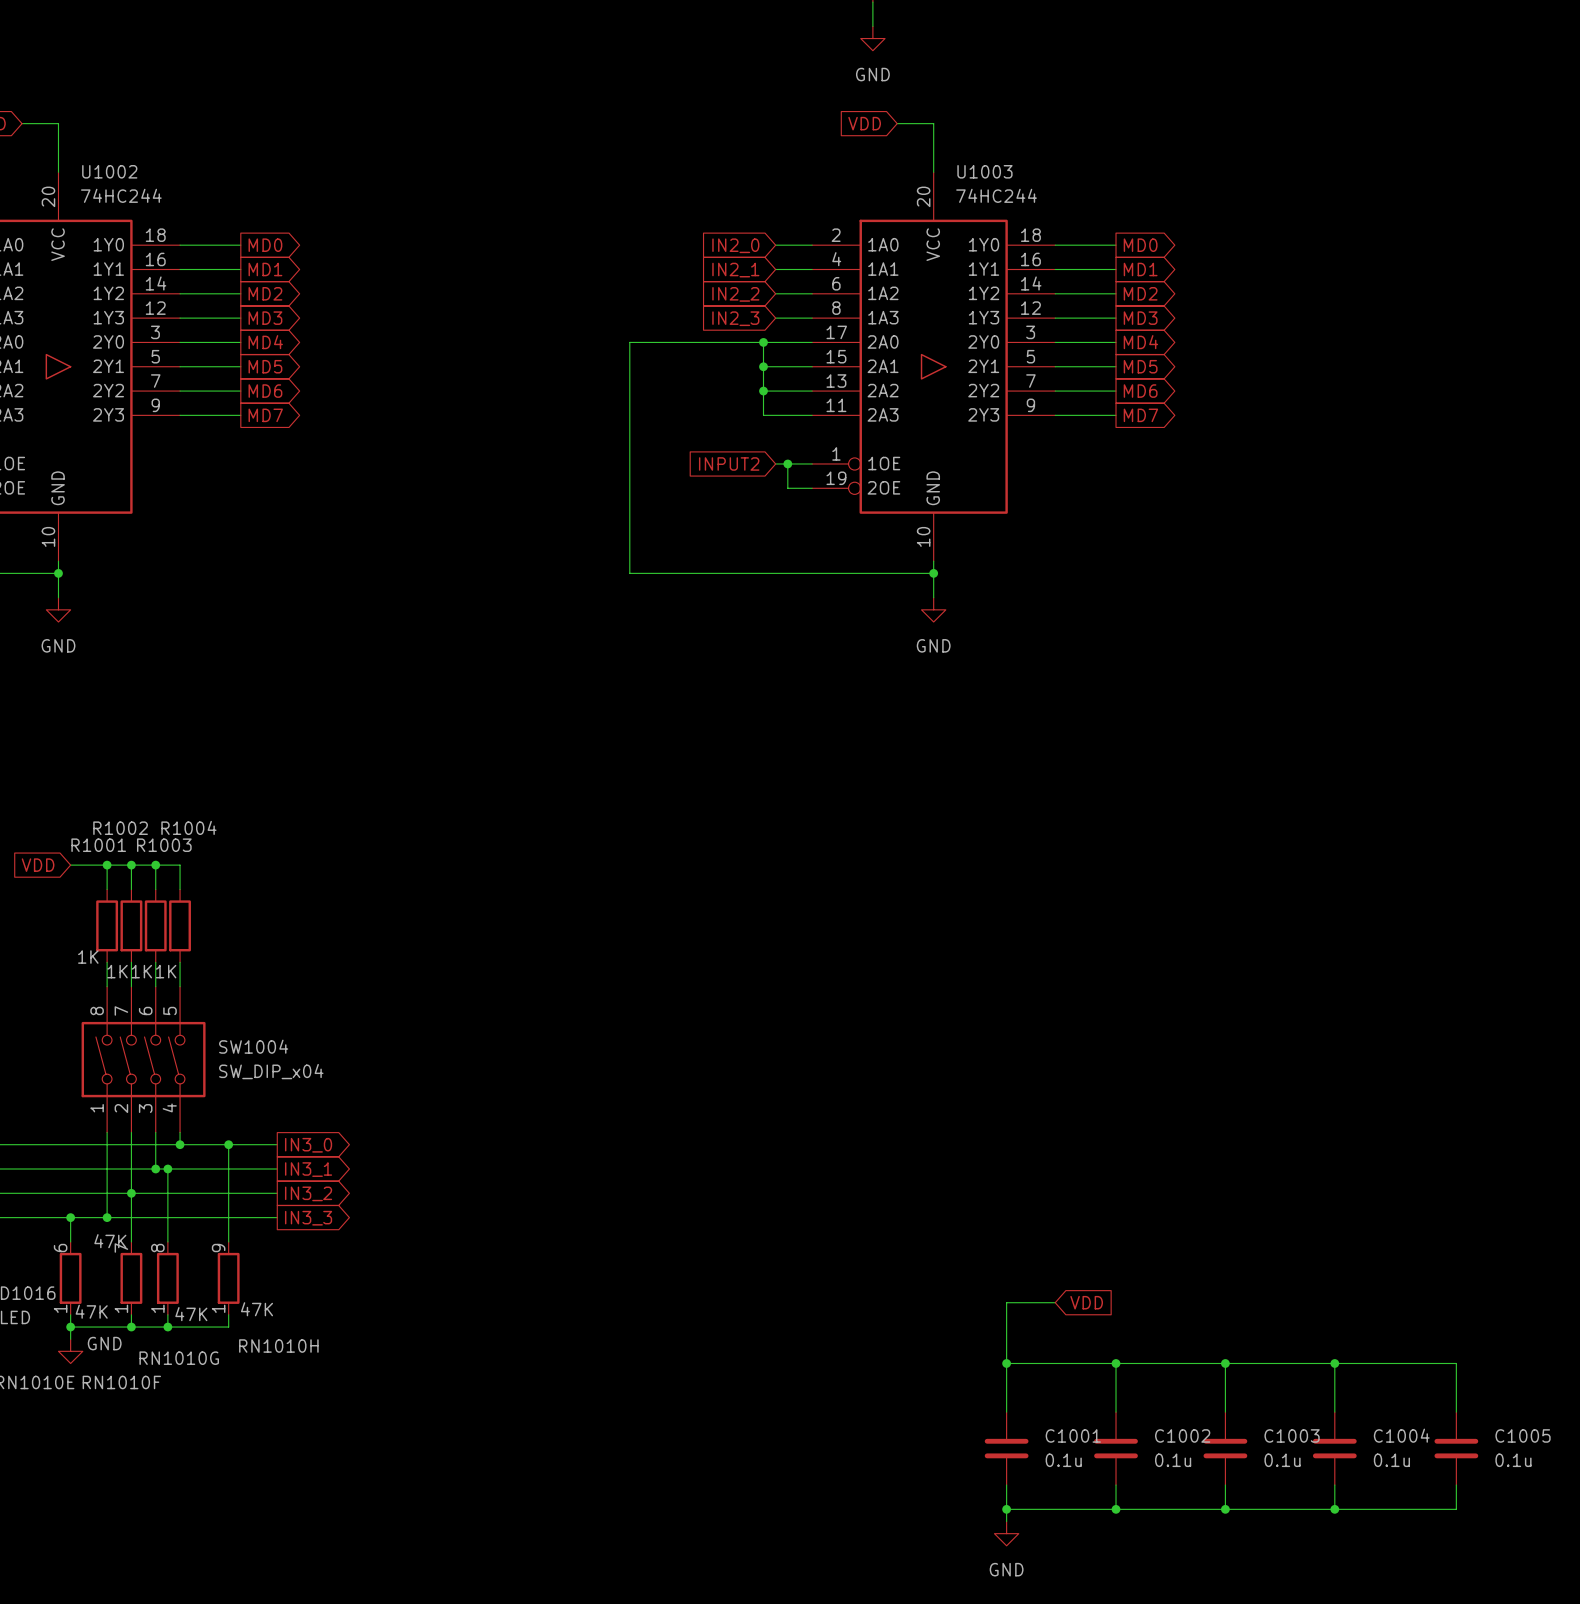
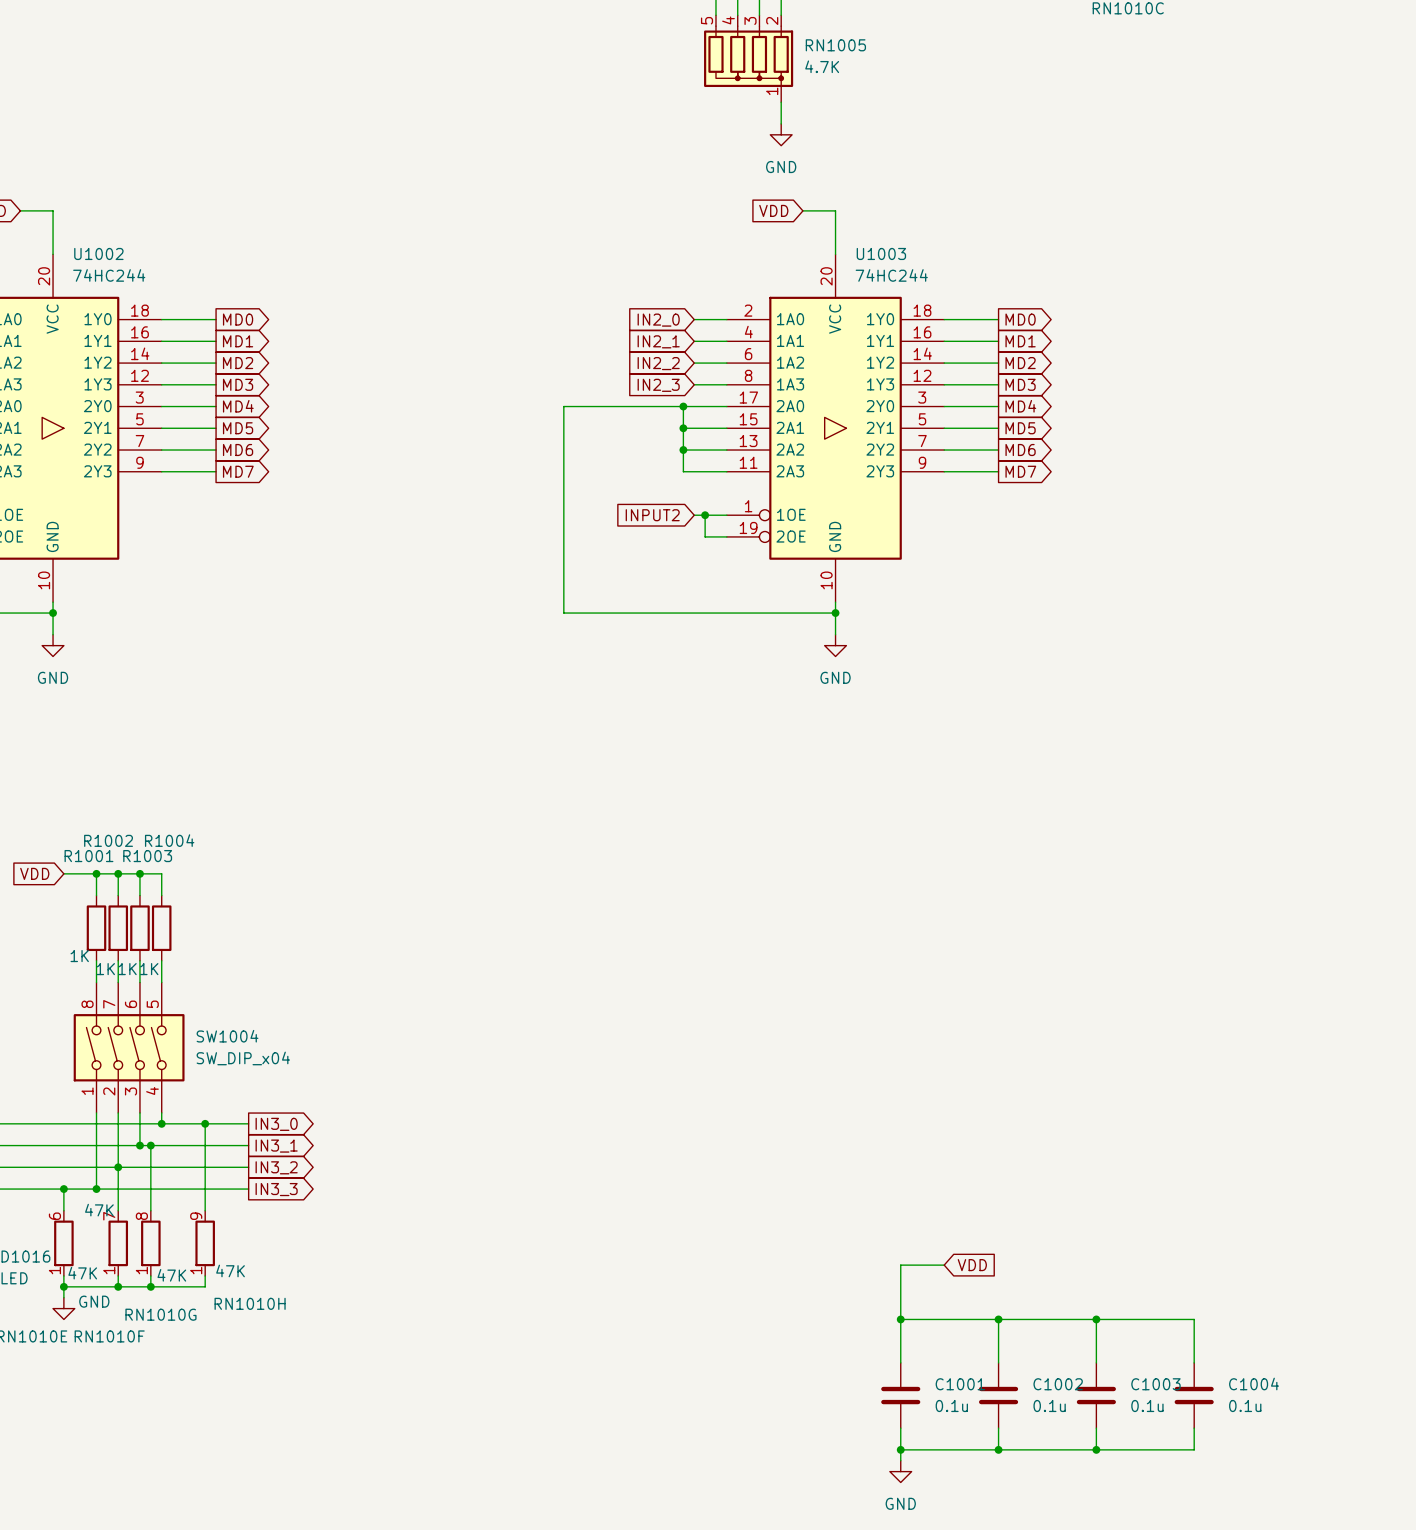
wire: (1334, 1363) (1456, 1363) (1456, 1412) -> none
junction: (1334, 1363) -> none
C1005: 0.1u (1456, 1448) -> none
wire: (1456, 1485) (1456, 1509) (1334, 1509) -> none
junction: (1334, 1509) -> none

